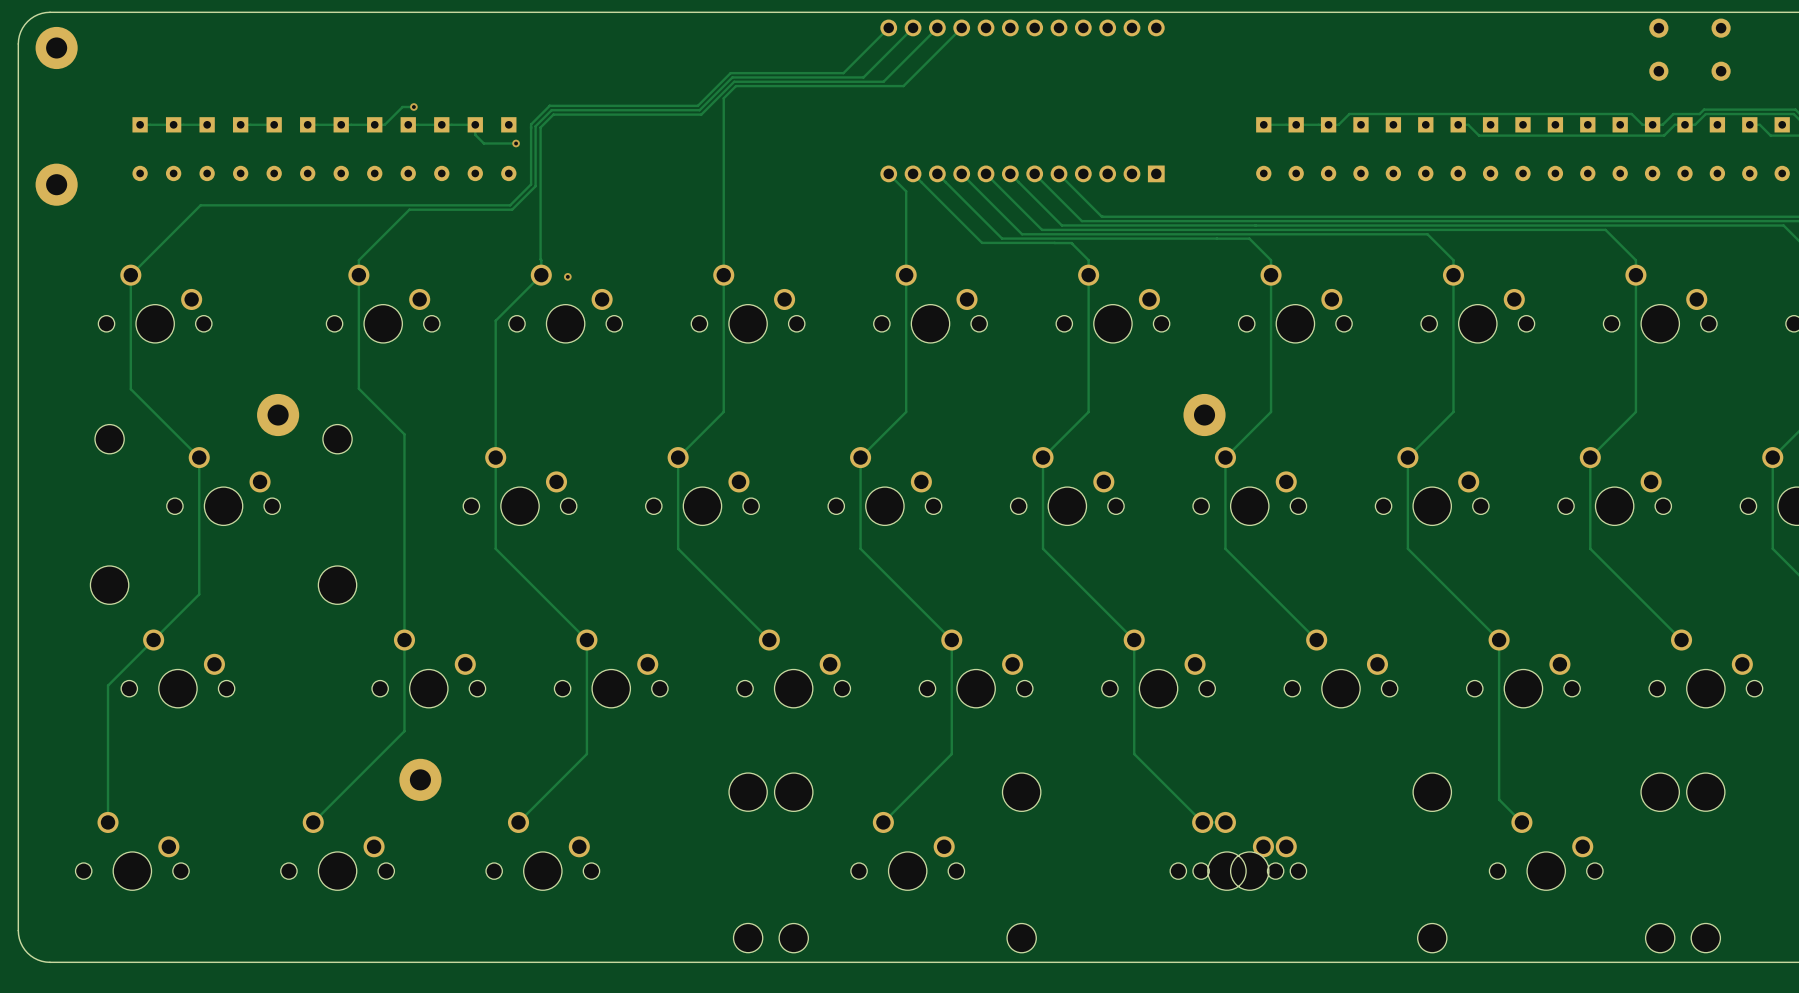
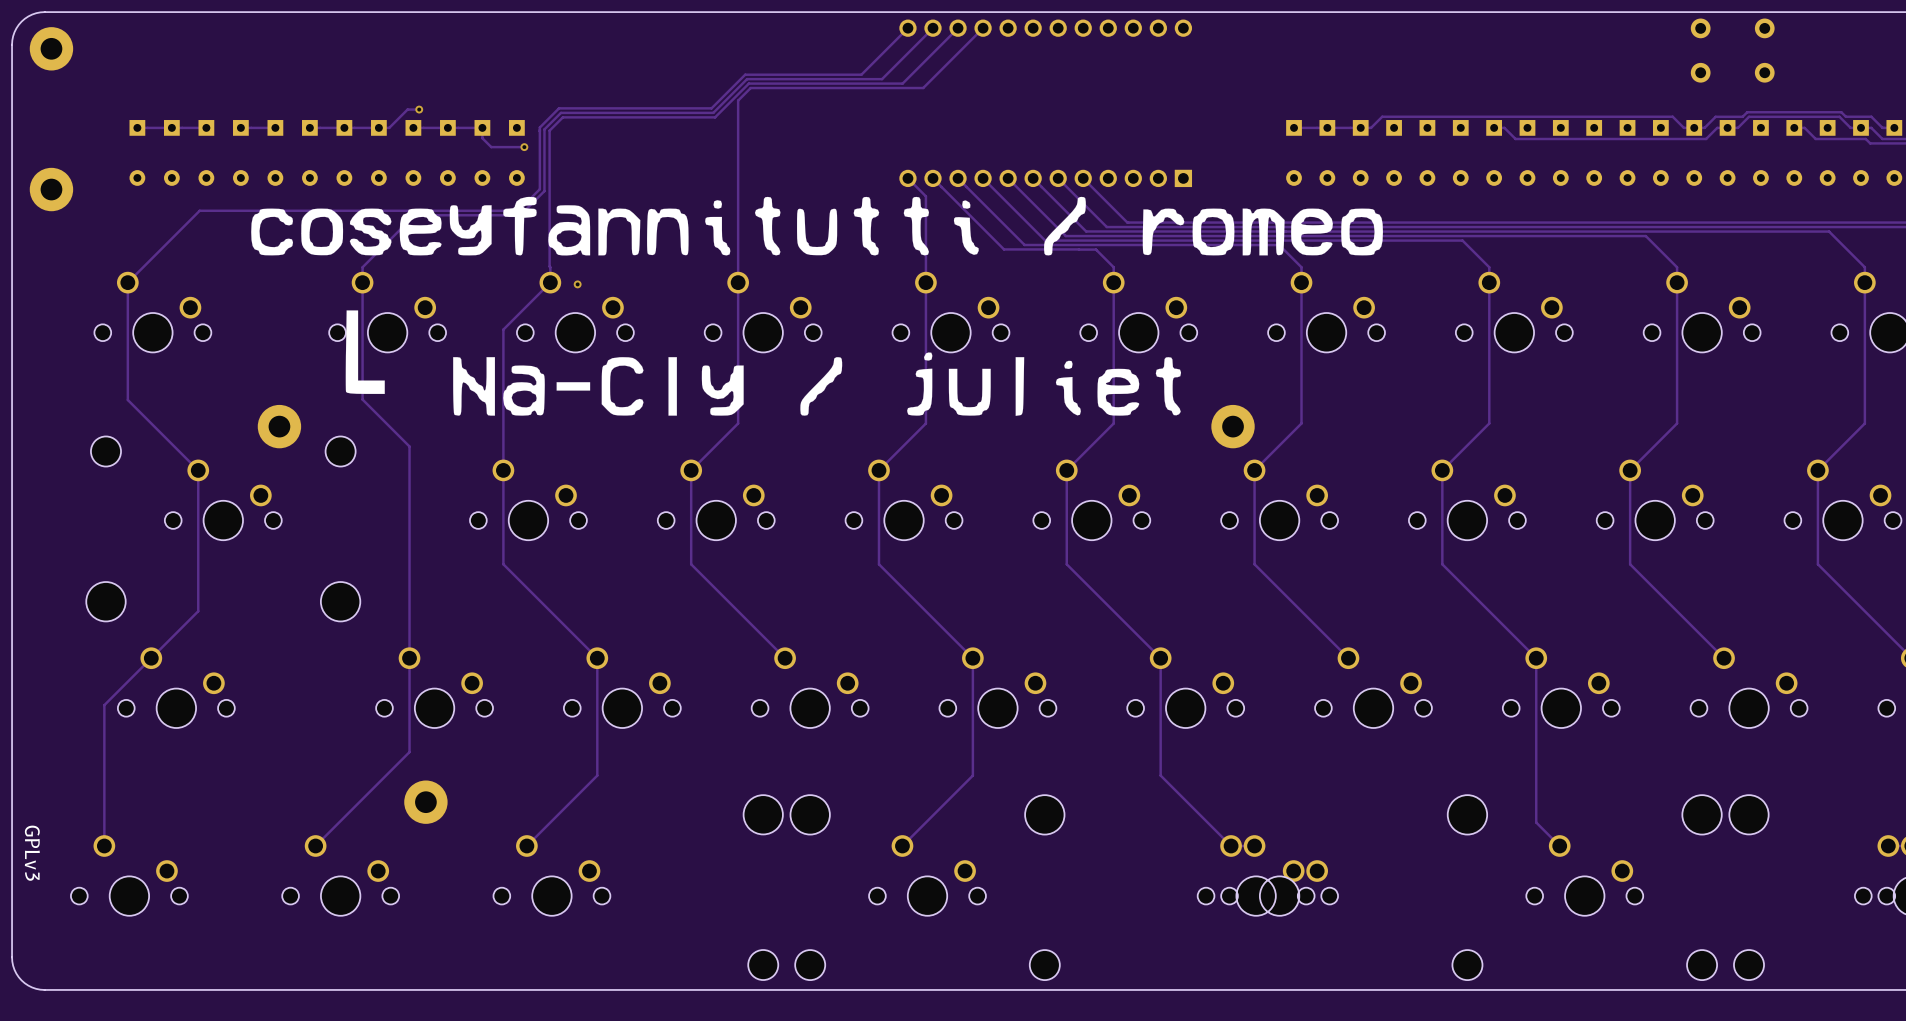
drawing: none -> [251, 196, 1383, 416]
text: none -> GPLv3 (32, 853)

